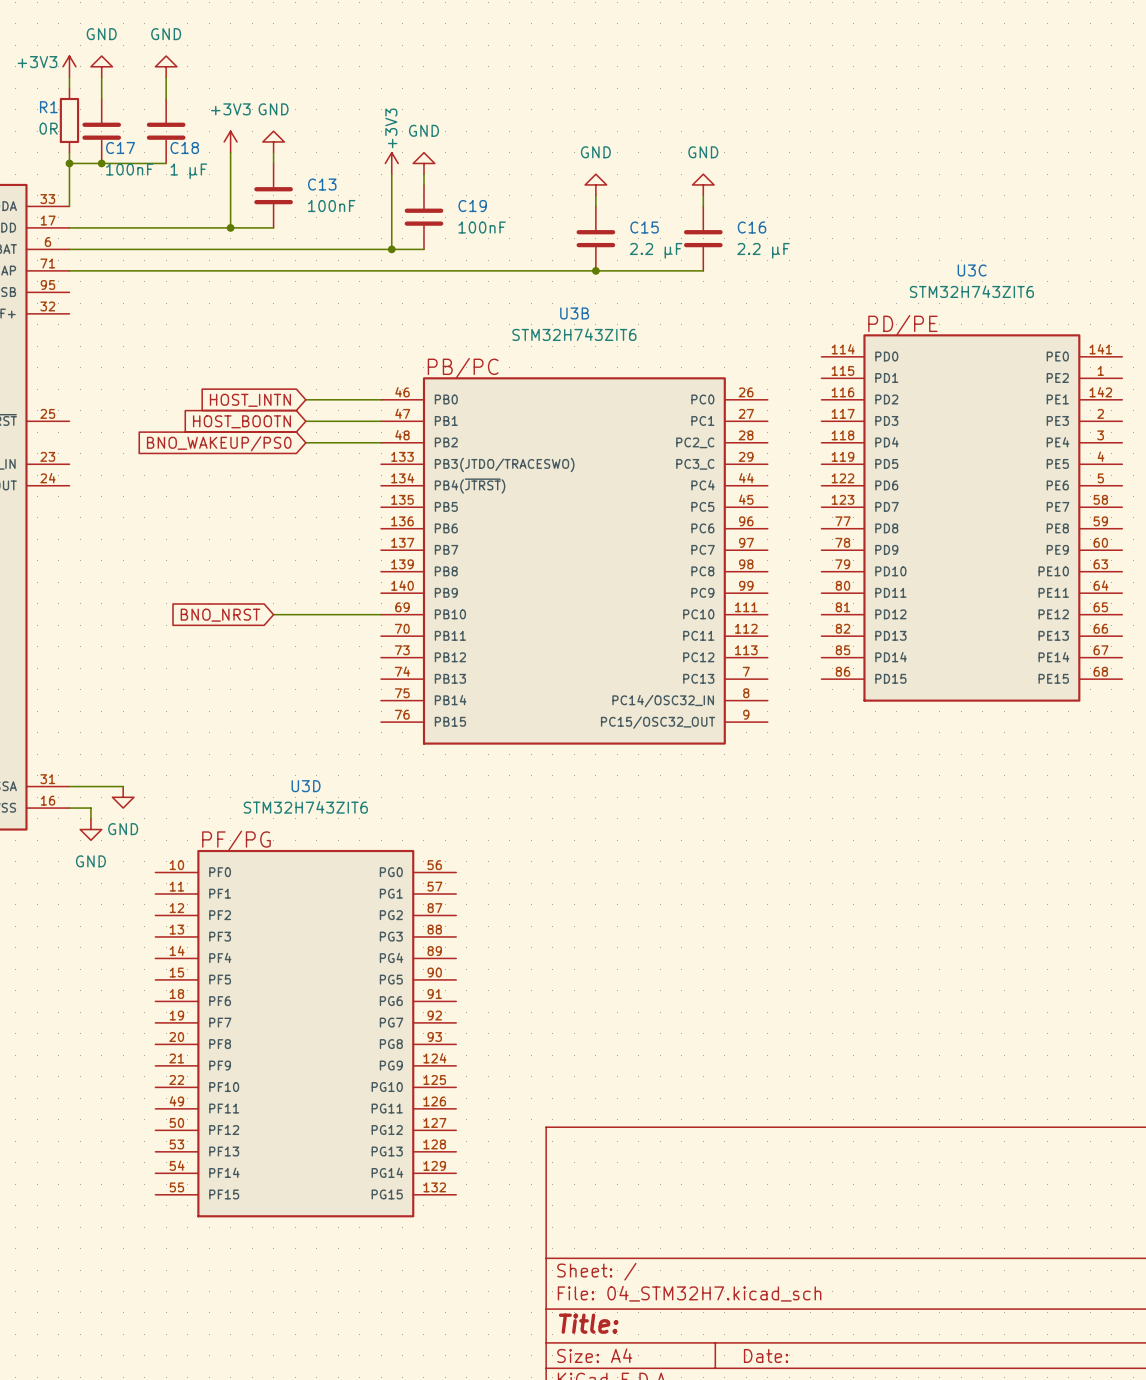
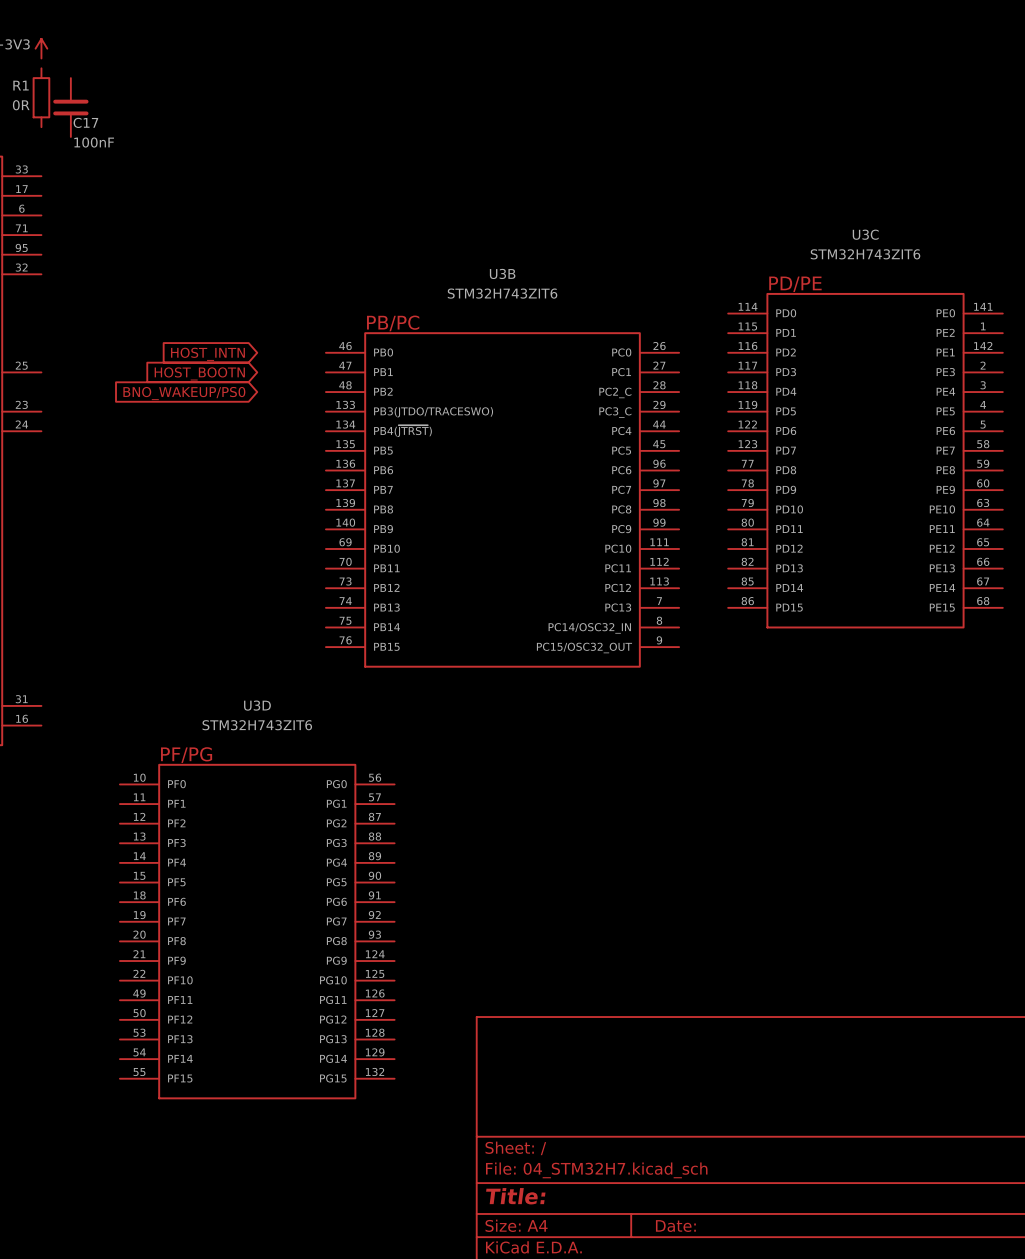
power symbol: GND (101, 66) -> none
power symbol: GND (166, 66) -> none
wire: (69, 77) (69, 88) -> none
wire: (101, 77) (101, 99) -> none
wire: (166, 77) (166, 99) -> none
C18: 1 µF (166, 131) -> none
power symbol: +3V3 (230, 141) -> none
power symbol: GND (273, 141) -> none
wire: (69, 152) (69, 206) -> none
wire: (230, 152) (230, 227) -> none
wire: (273, 152) (273, 163) -> none
wire: (69, 163) (166, 163) -> none
junction: (69, 163) -> none
junction: (101, 163) -> none
power symbol: +3V3 (391, 163) -> none
power symbol: GND (423, 163) -> none
wire: (391, 174) (391, 249) -> none
wire: (423, 174) (423, 184) -> none
power symbol: GND (595, 184) -> none
power symbol: GND (703, 184) -> none
C13: 100nF (273, 195) -> none
wire: (595, 195) (595, 206) -> none
wire: (703, 195) (703, 206) -> none
C19: 100nF (423, 217) -> none
wire: (69, 227) (273, 227) -> none
junction: (230, 227) -> none
C15: 2.2 µF (595, 238) -> none
C16: 2.2 µF (703, 238) -> none
wire: (69, 249) (423, 249) -> none
junction: (391, 249) -> none
wire: (69, 270) (703, 270) -> none
junction: (595, 270) -> none
wire: (305, 399) (381, 399) -> none
wire: (305, 421) (381, 421) -> none
wire: (305, 442) (381, 442) -> none
wire: (273, 614) (381, 614) -> none
global label: BNO_NRST (220, 615) -> none
wire: (69, 786) (123, 786) -> none
power symbol: GND (123, 797) -> none
wire: (69, 808) (90, 808) (90, 818) -> none
power symbol: GND (90, 829) -> none

